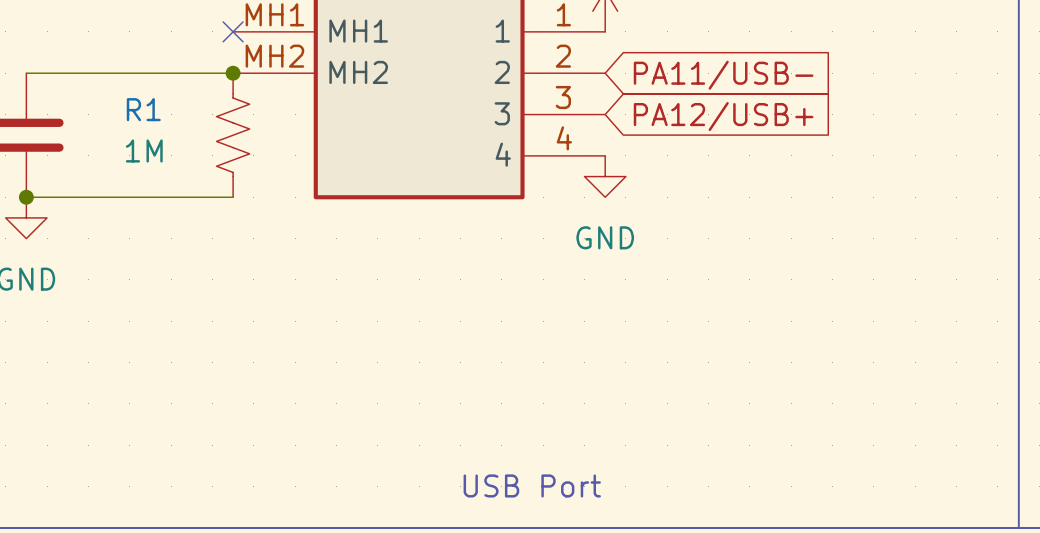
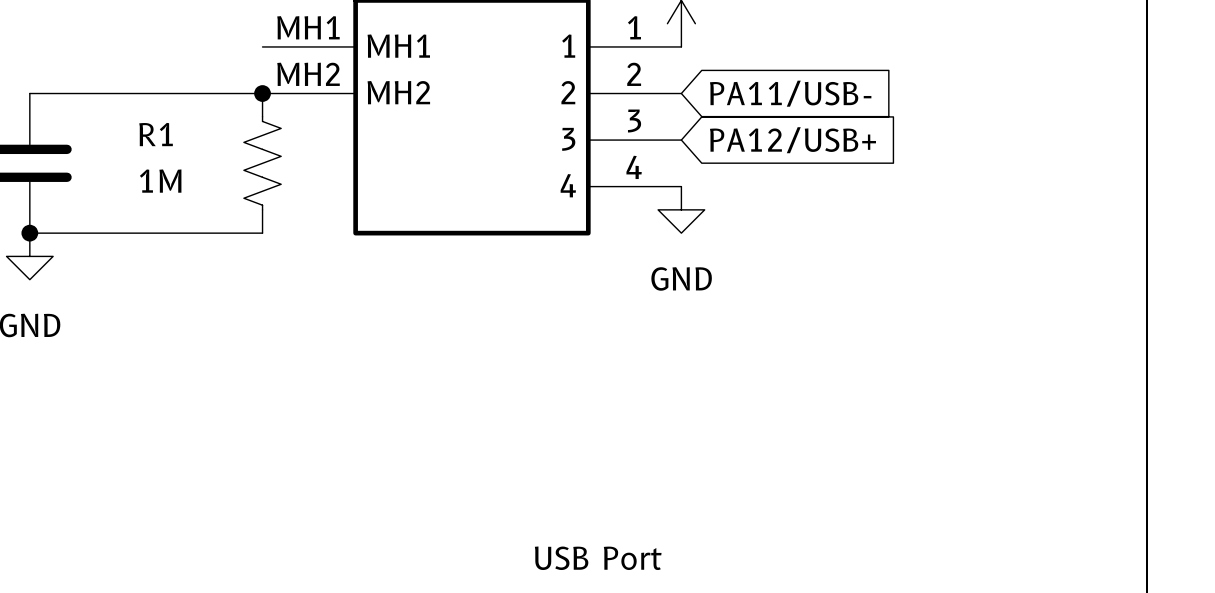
no-connect mark: (233, 31) -> none

